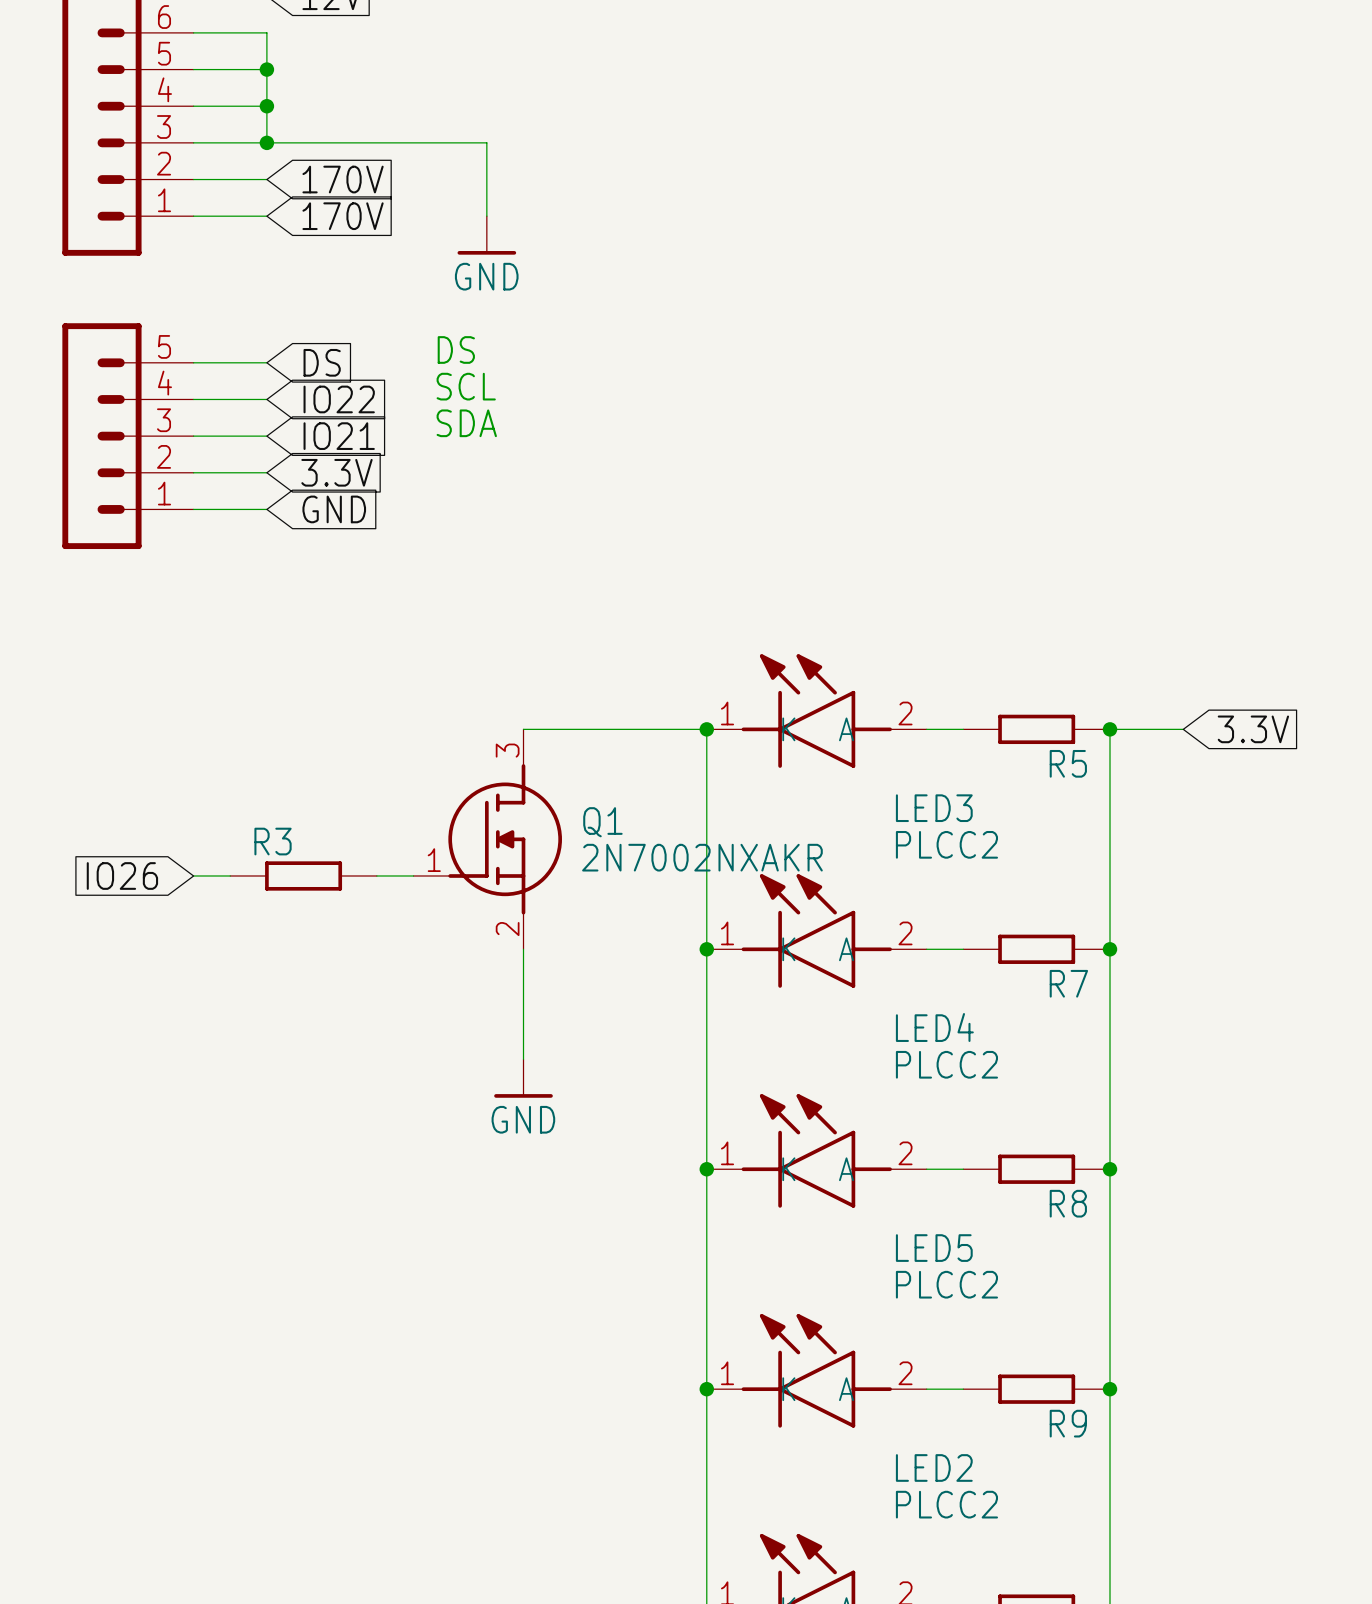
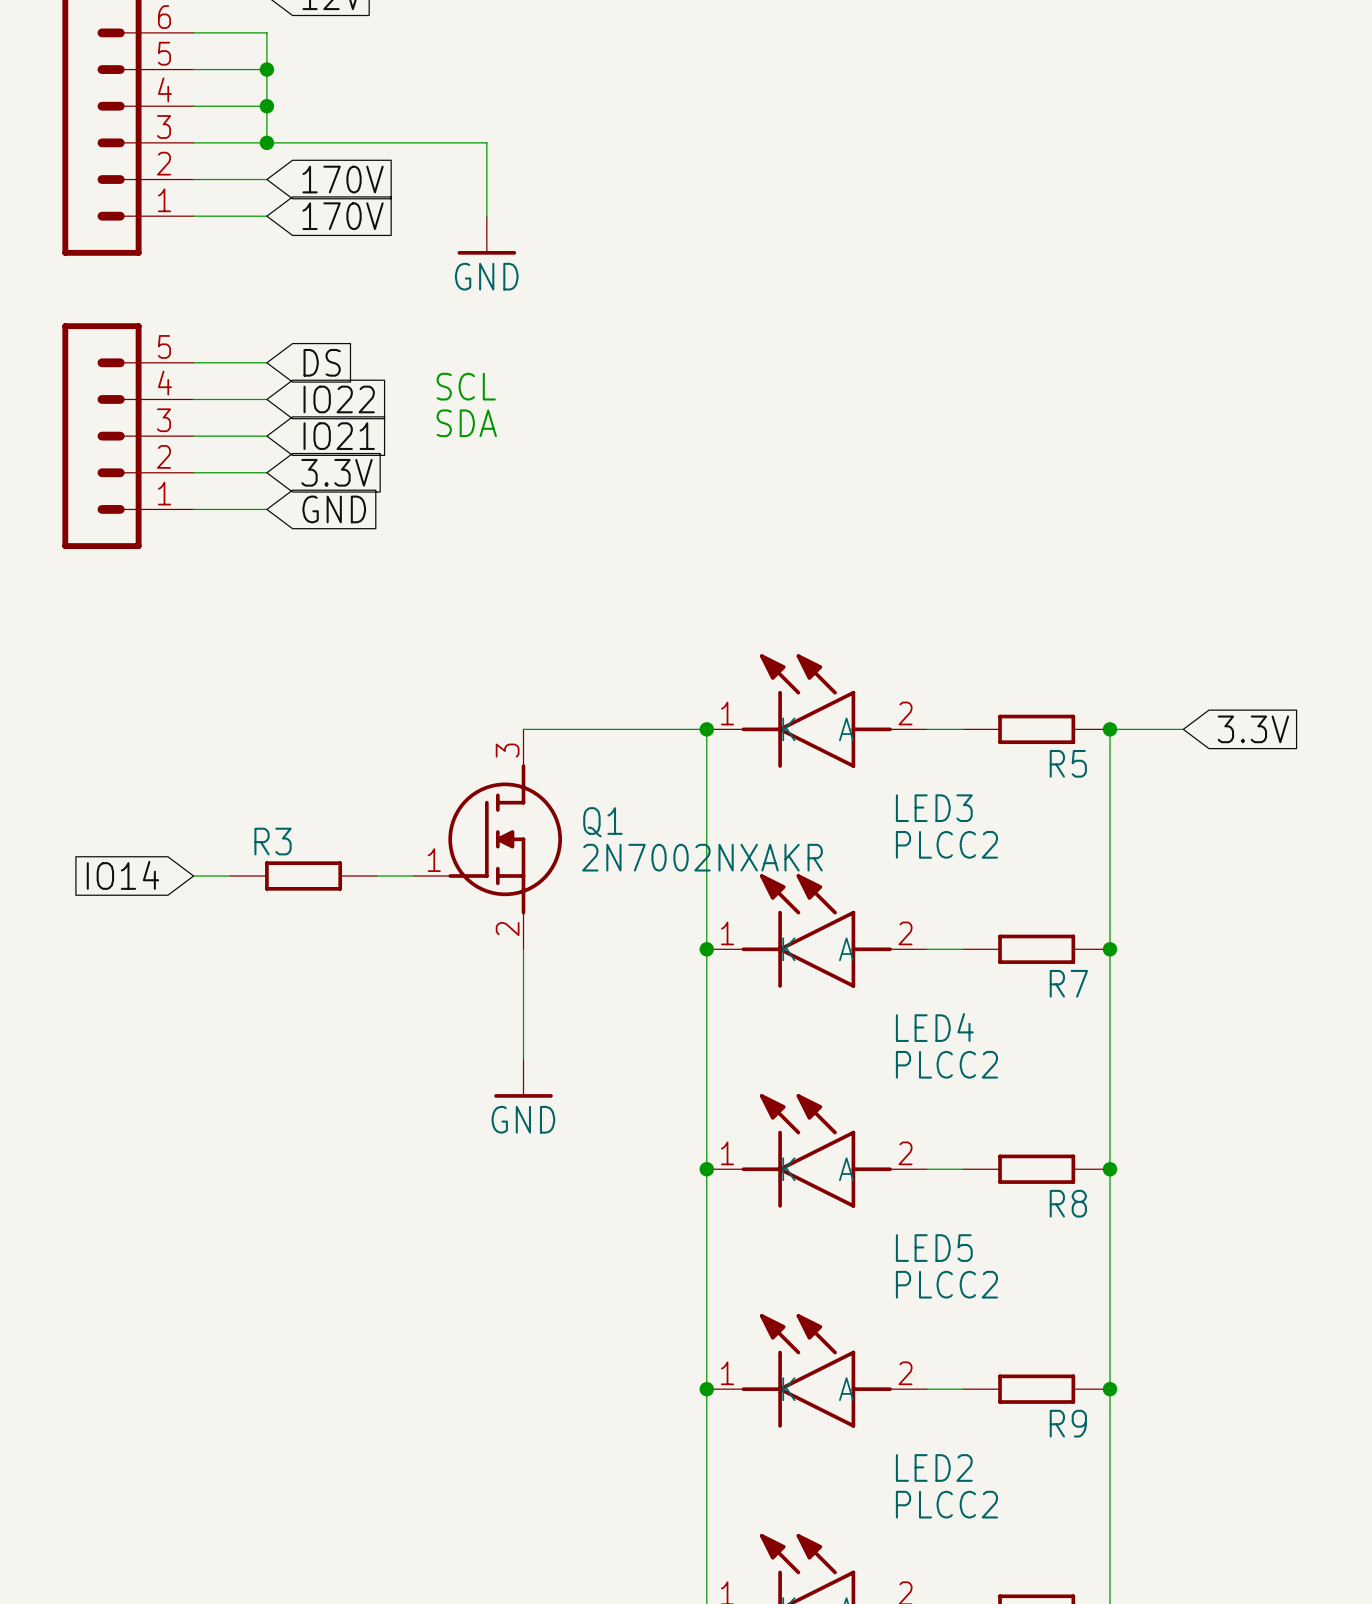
text: DS (456, 349) -> none
global label: IO26 (122, 875) -> IO14 (122, 875)

